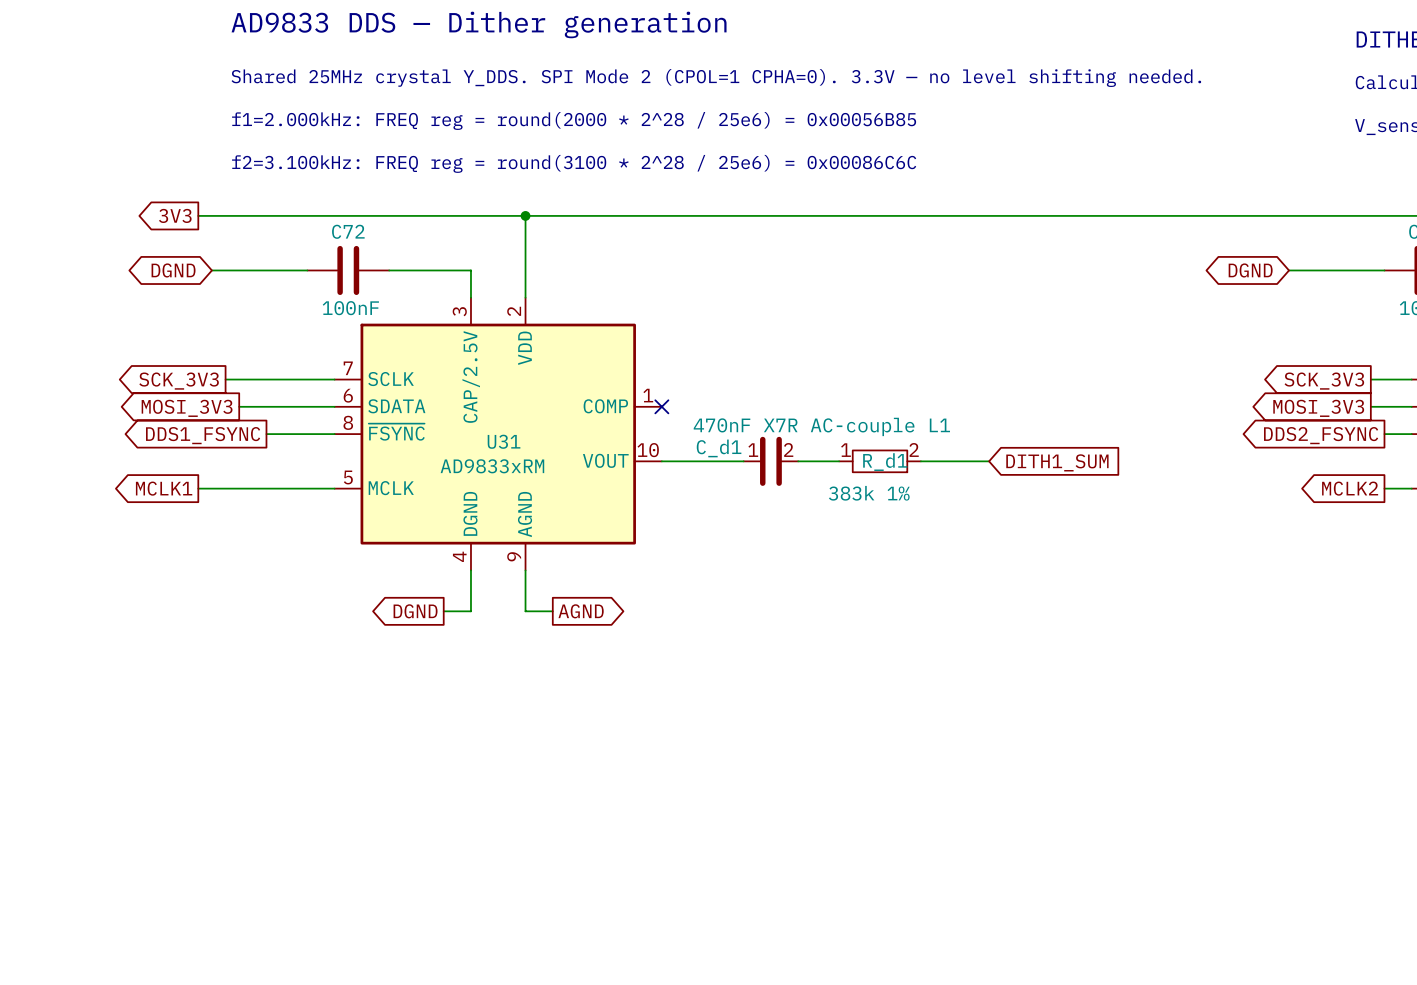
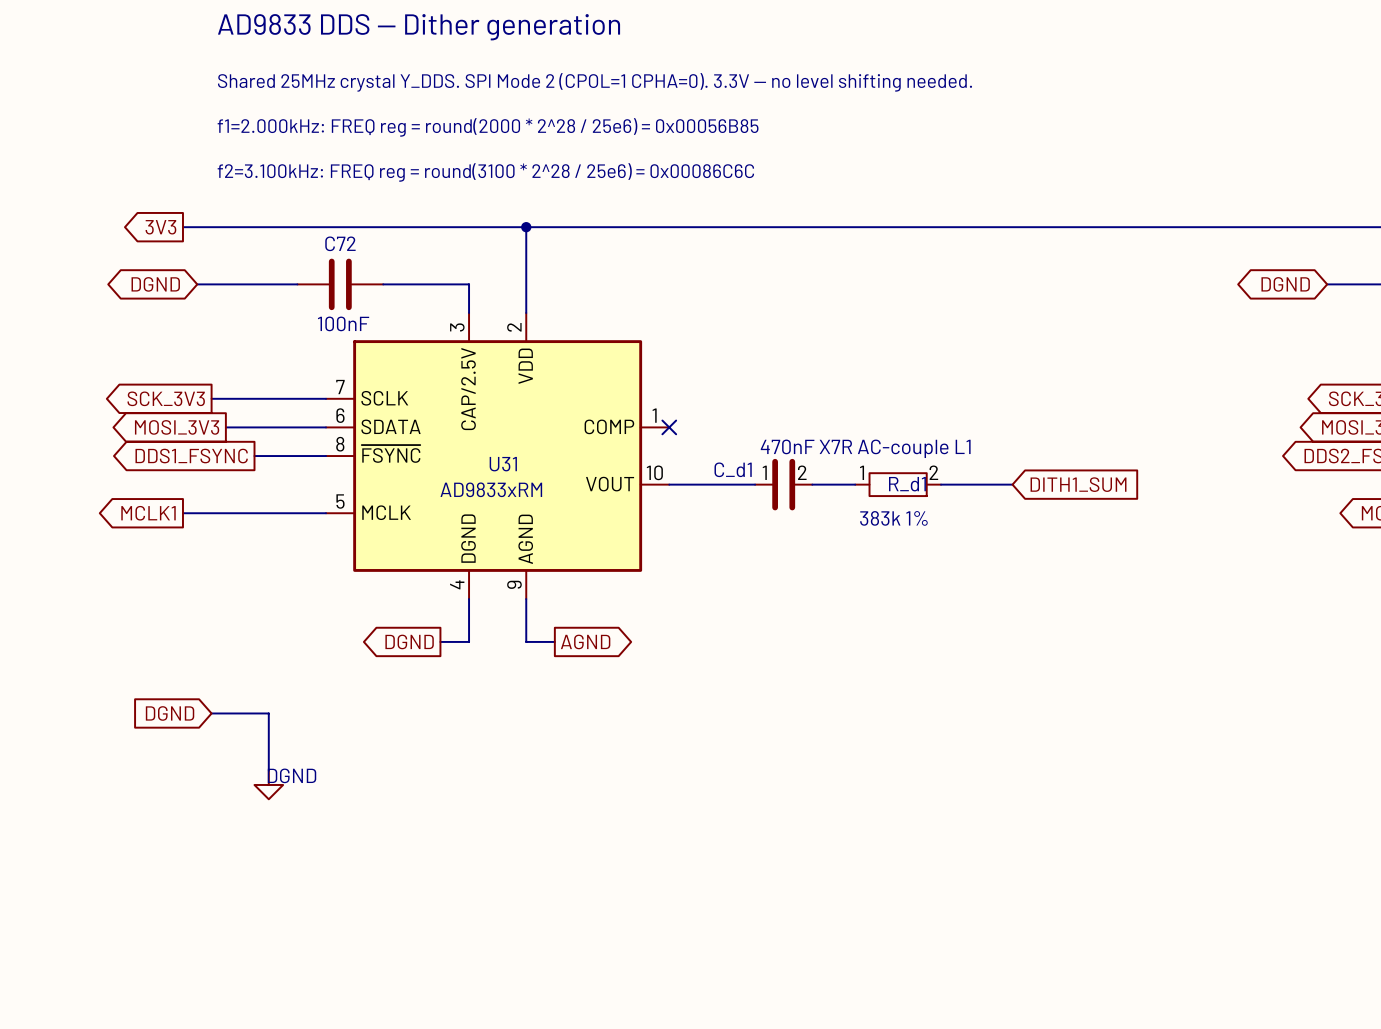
global label: none -> DGND (170, 713)
wire: none -> (211, 713) (268, 713) (268, 770)
power symbol: none -> DGND (268, 784)

